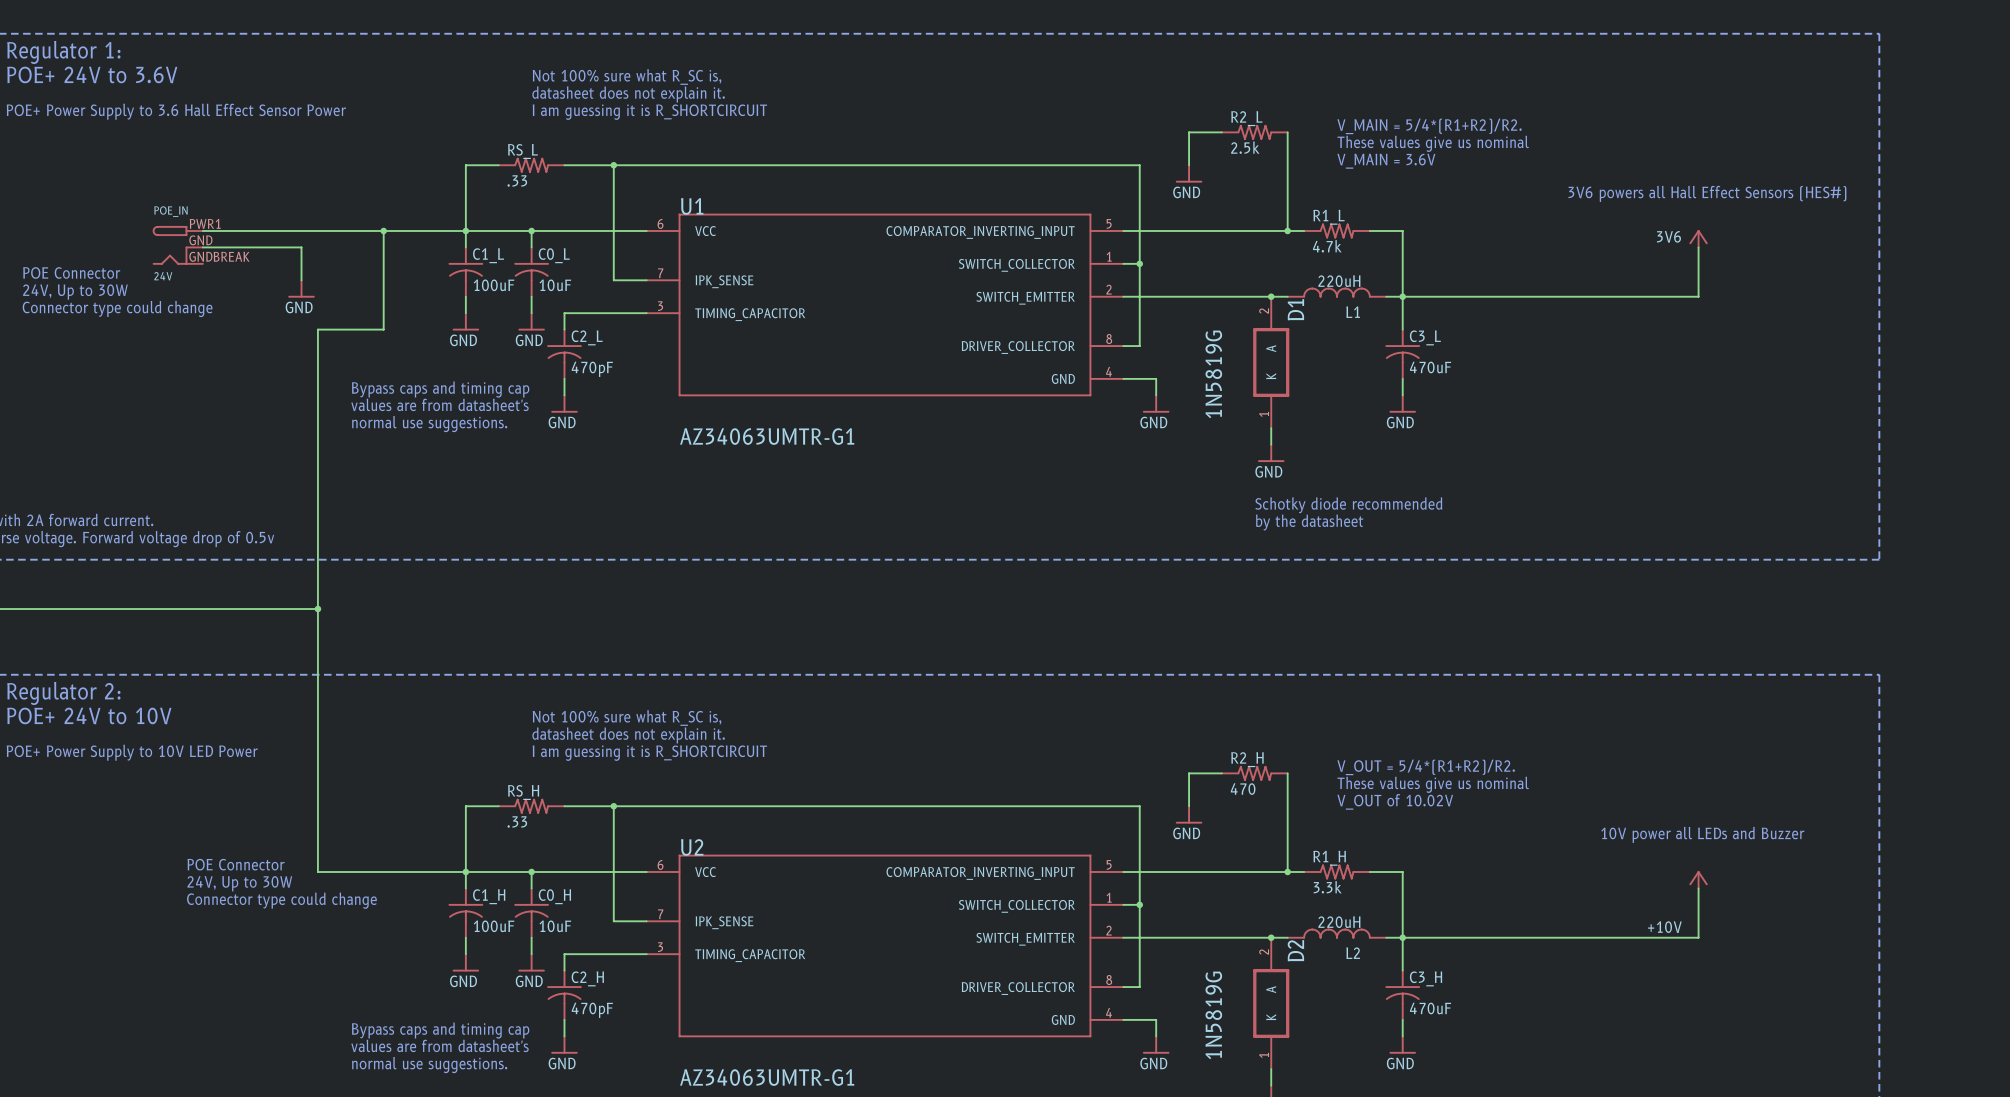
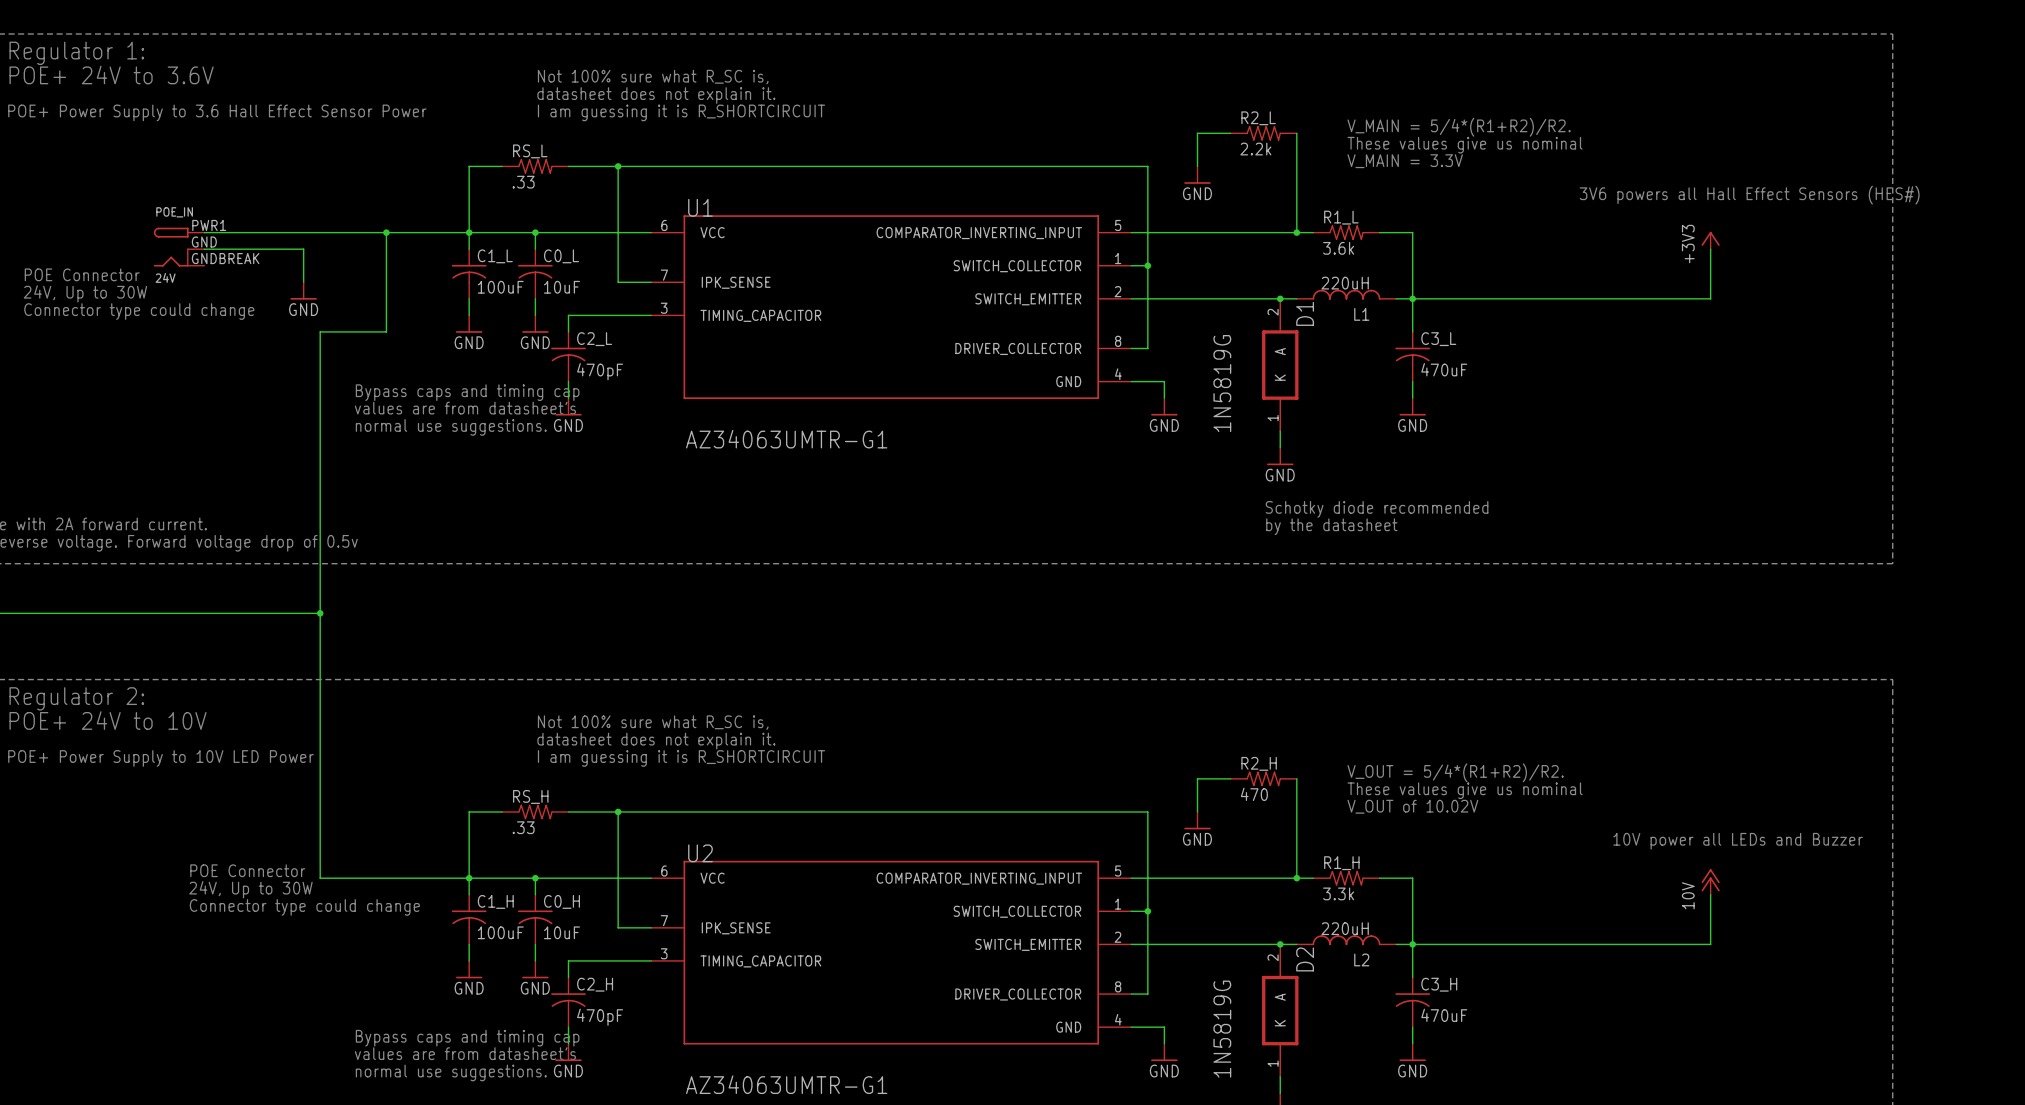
R2_L value: 2.5k (1245, 147) -> 2.2k (1255, 149)
text: V_MAIN = 3.6V (1386, 161) -> V_MAIN = 3.3V (1405, 161)
power symbol: 3V6 (1698, 238) -> +3V3 (1710, 240)
R1_L value: 4.7k (1327, 246) -> 3.6k (1338, 248)
power symbol: +10V (1698, 879) -> 10V (1710, 881)

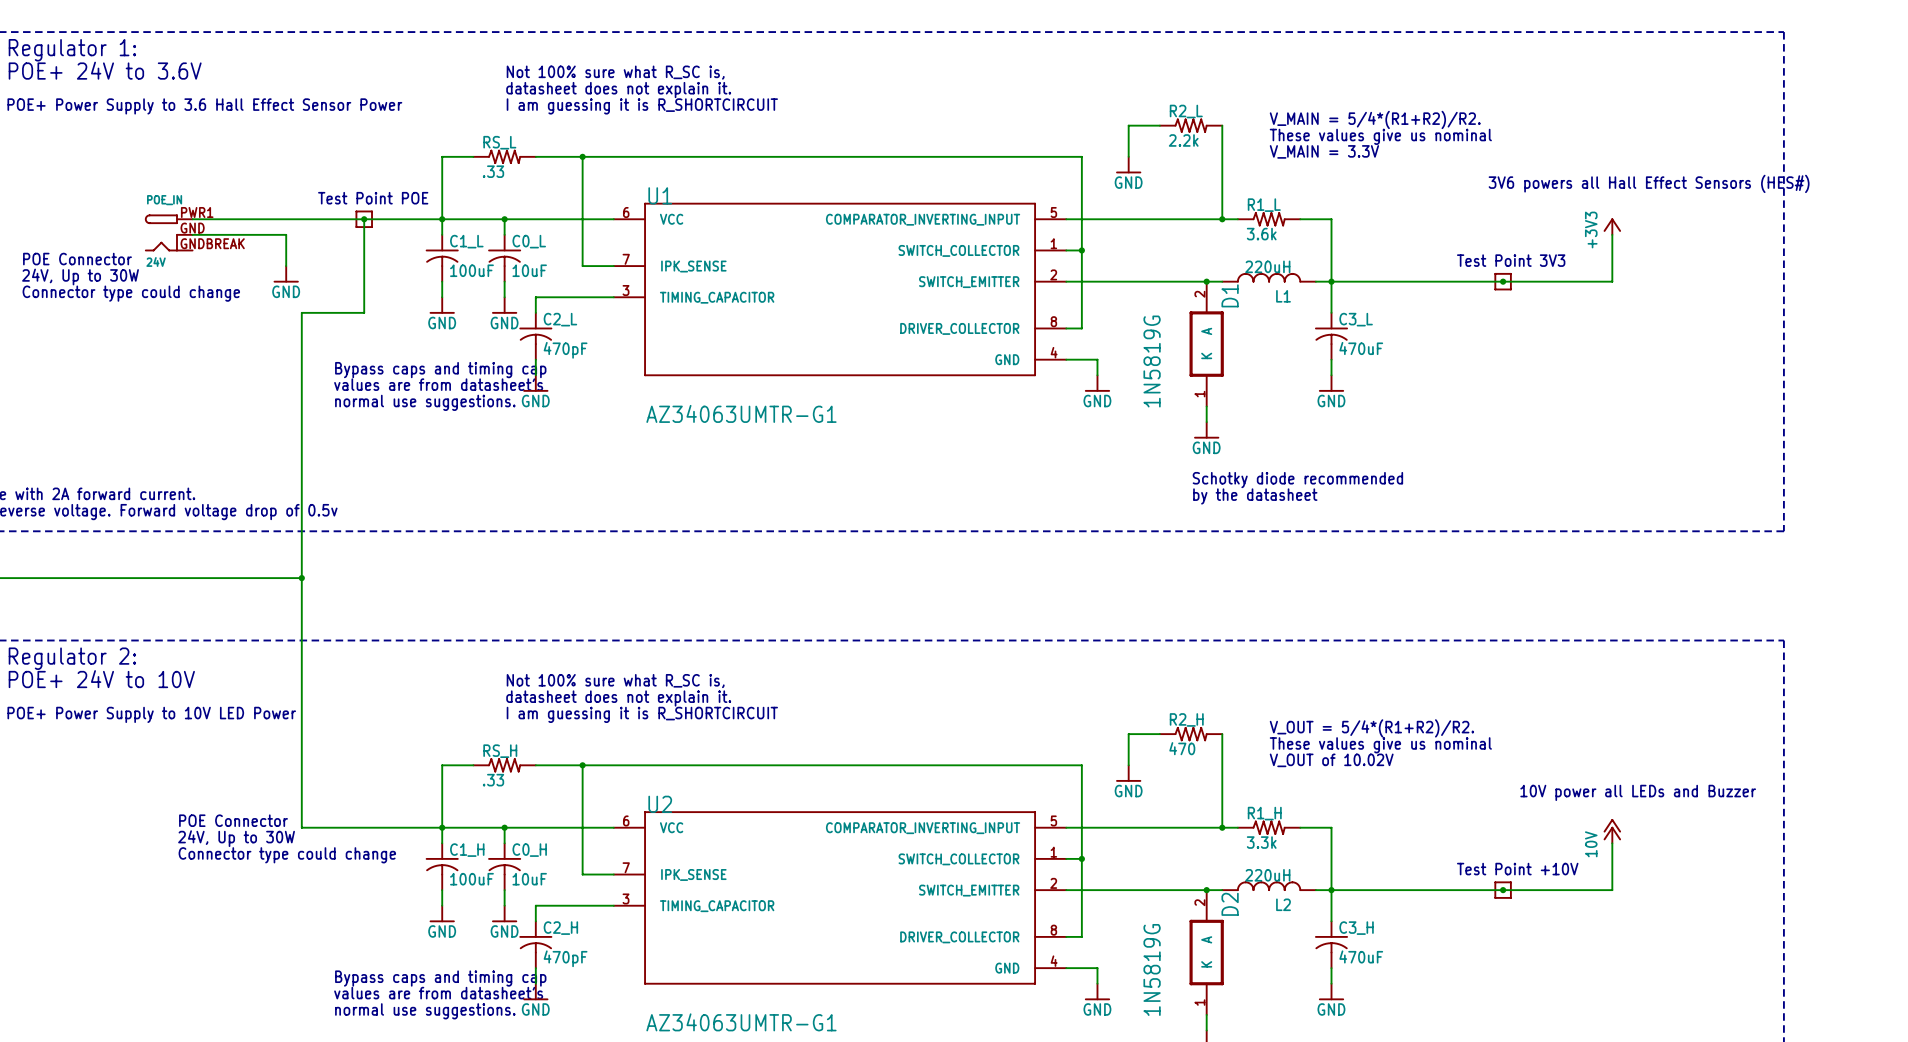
text: none -> Test Point POE (373, 198)
part: none -> (364, 219)
text: none -> Test Point 3V3 (1511, 260)
part: none -> (1503, 281)
junction: none -> (1503, 281)
text: none -> Test Point +10V (1517, 869)
part: none -> (1503, 890)
junction: none -> (1503, 890)

